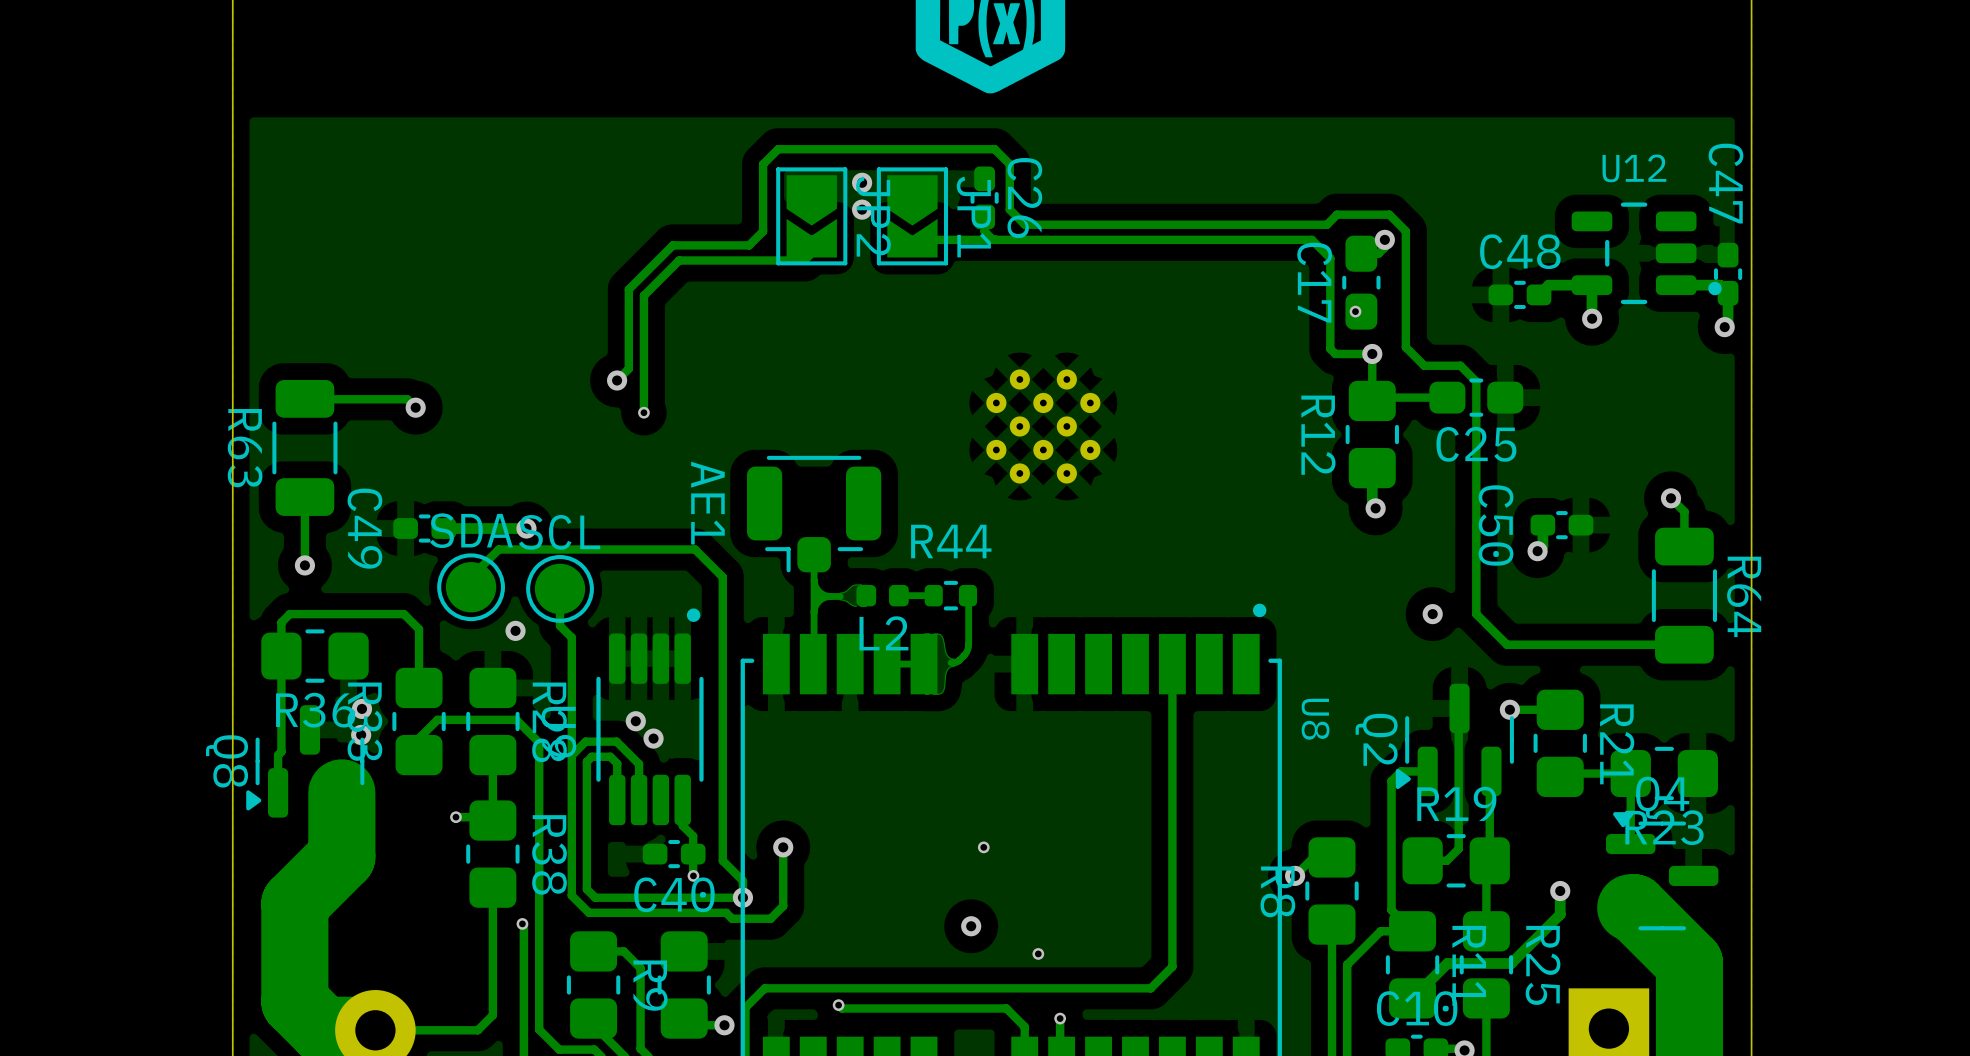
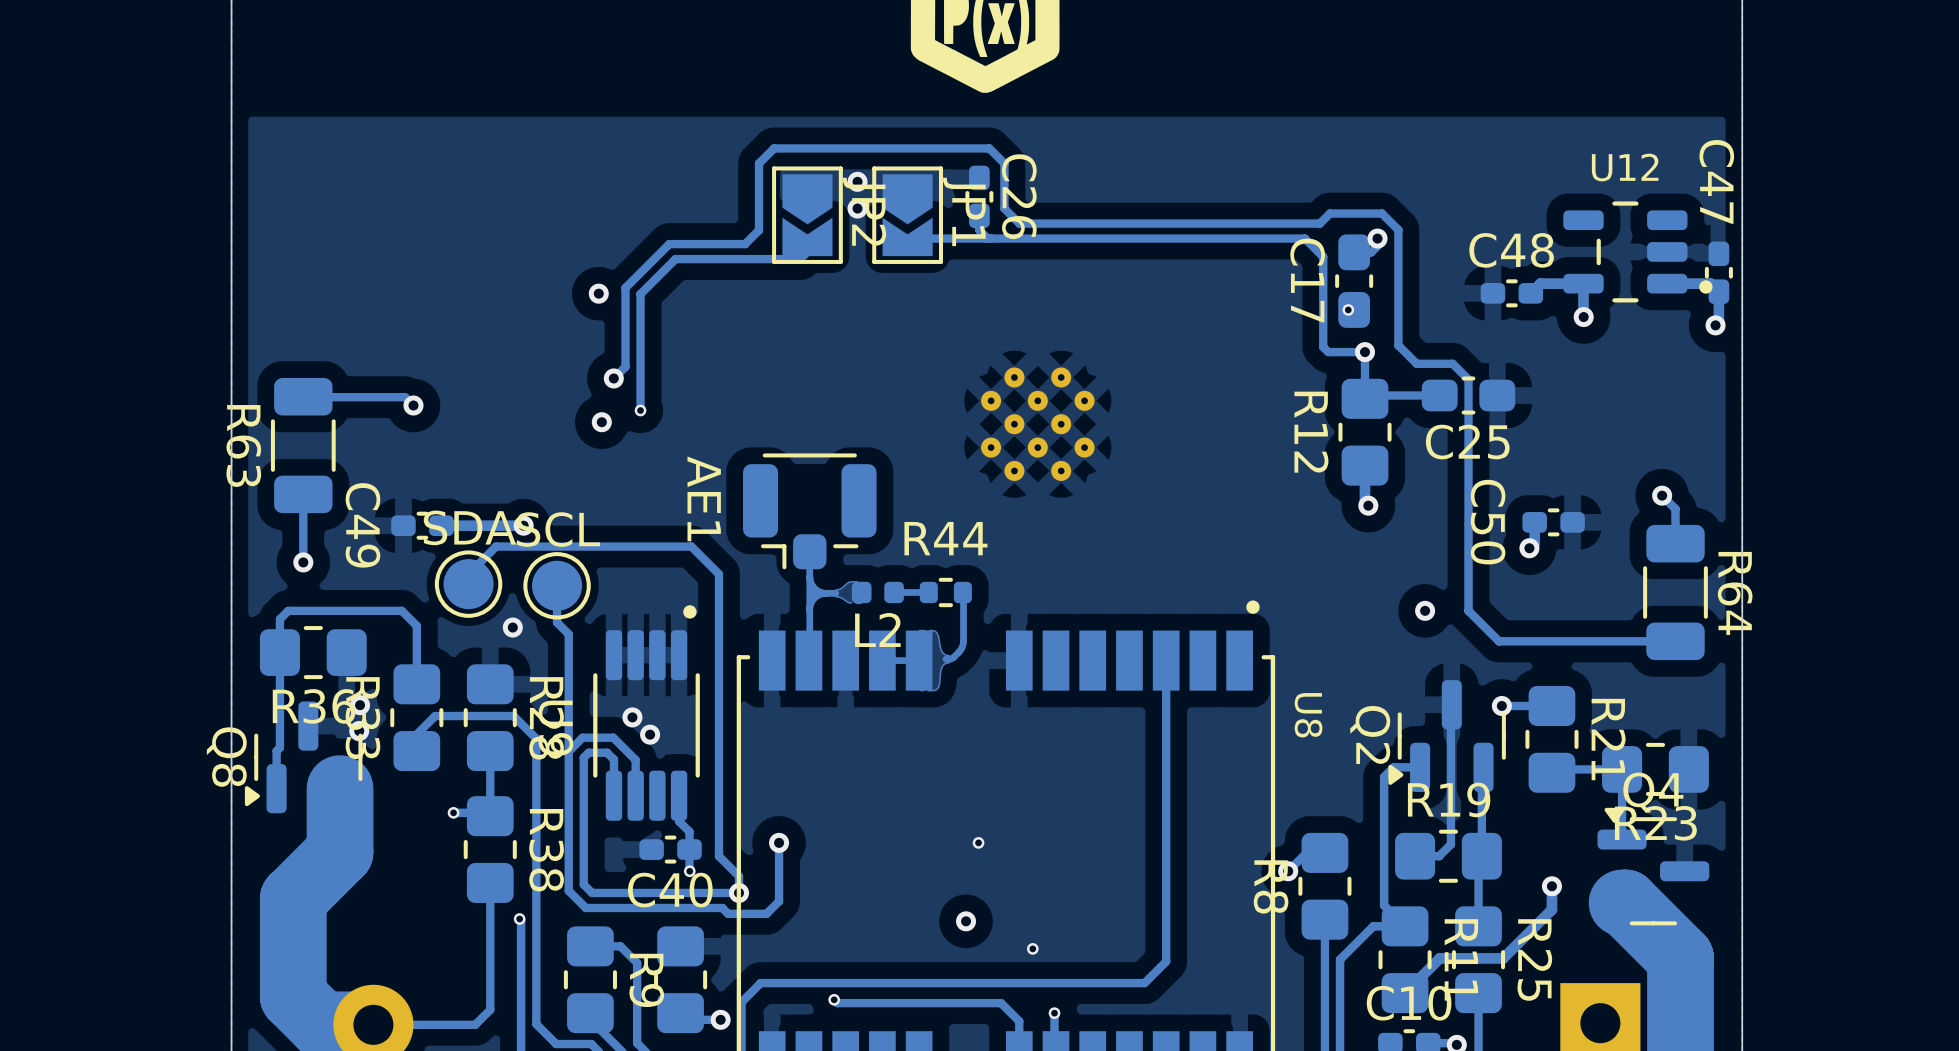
via: none -> (598, 293)
via: none -> (601, 422)

